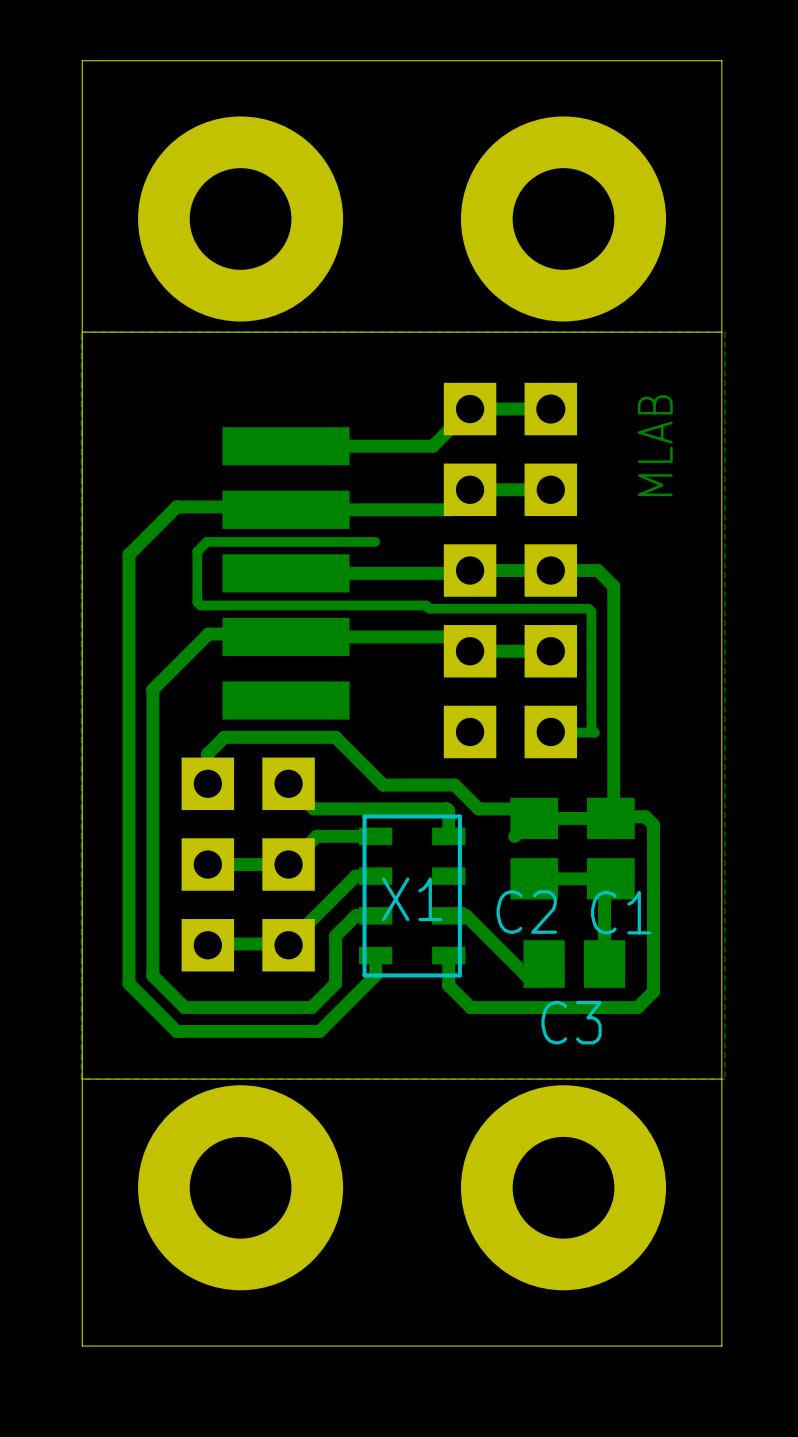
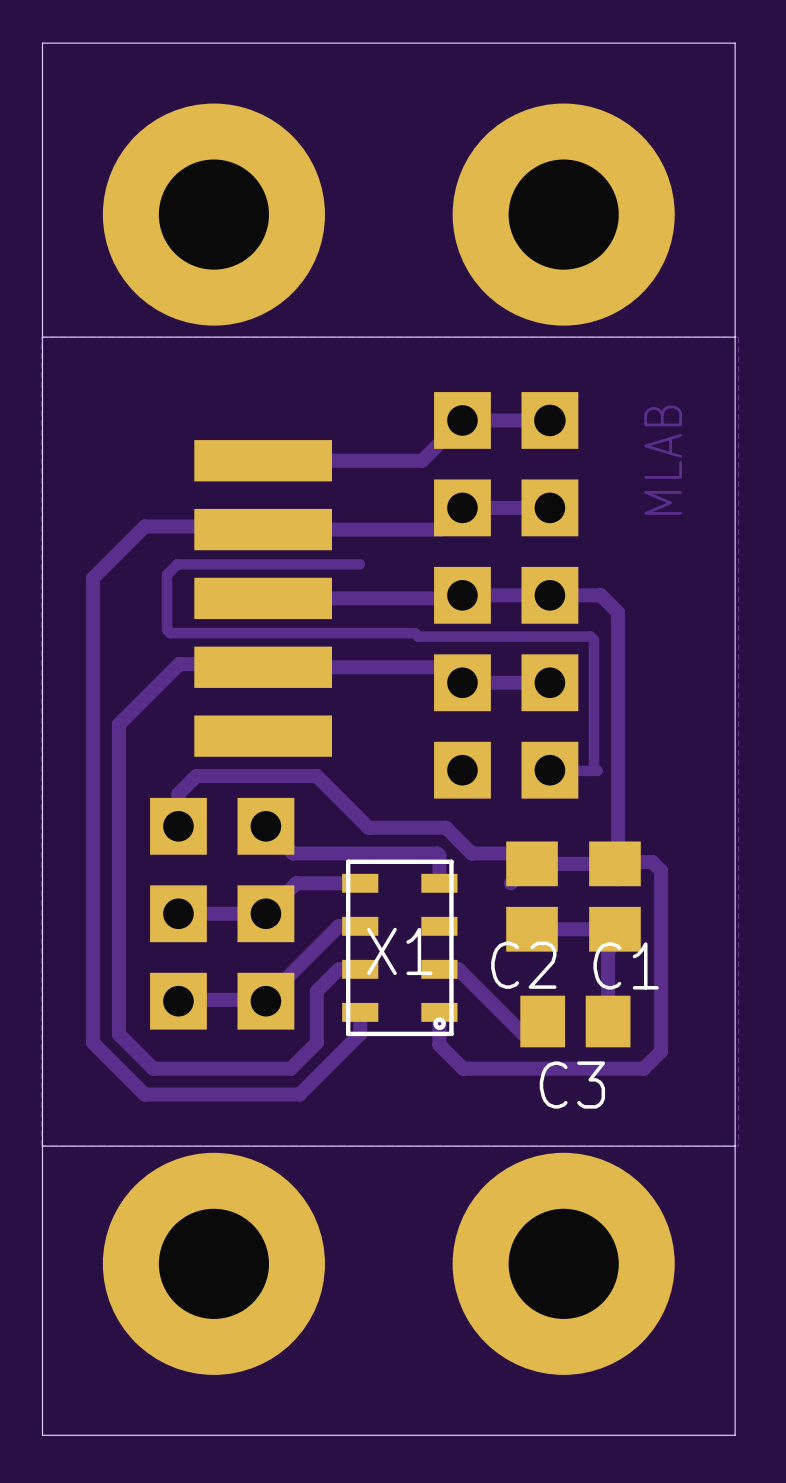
X1 footprint: [358, 814, 466, 978] -> [342, 859, 458, 1037]

